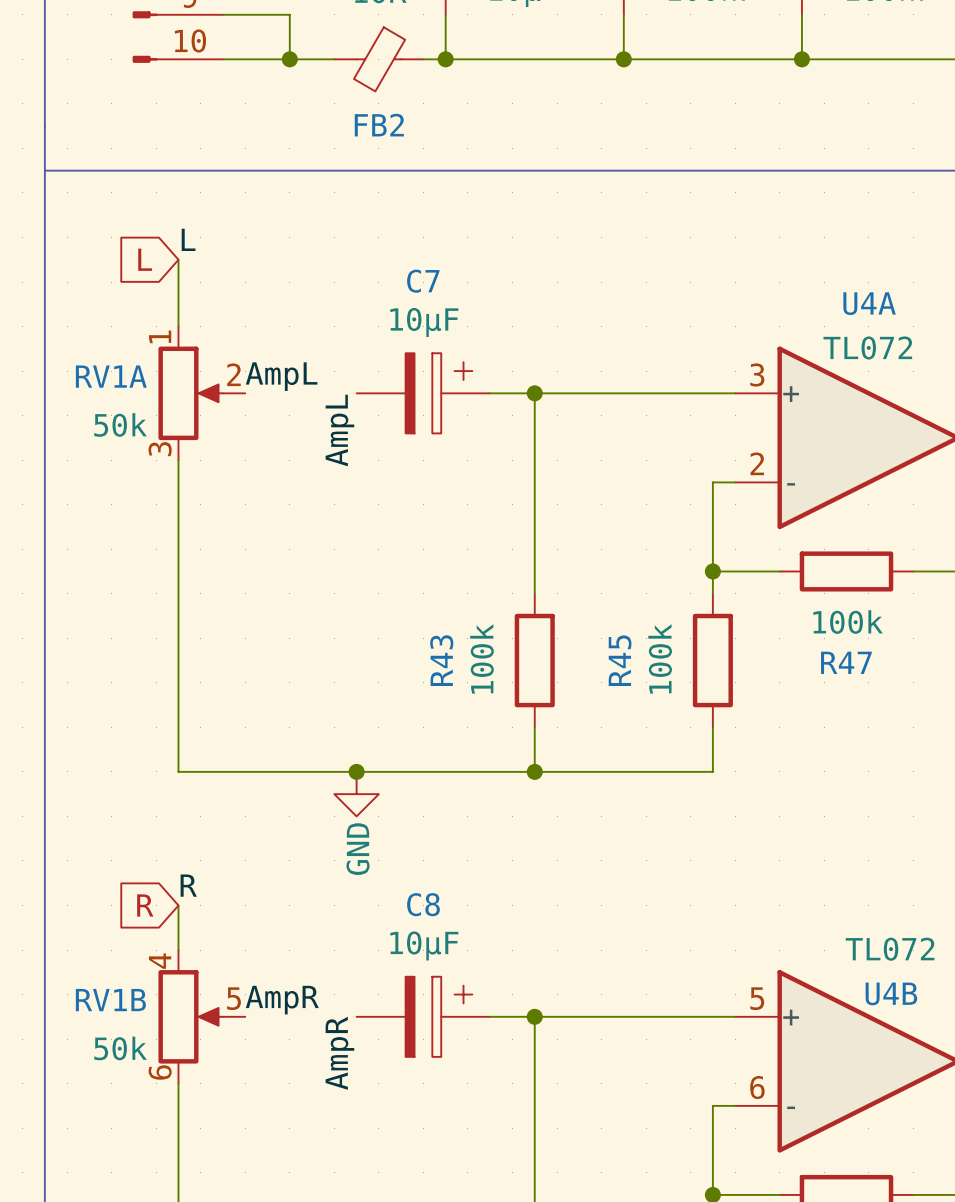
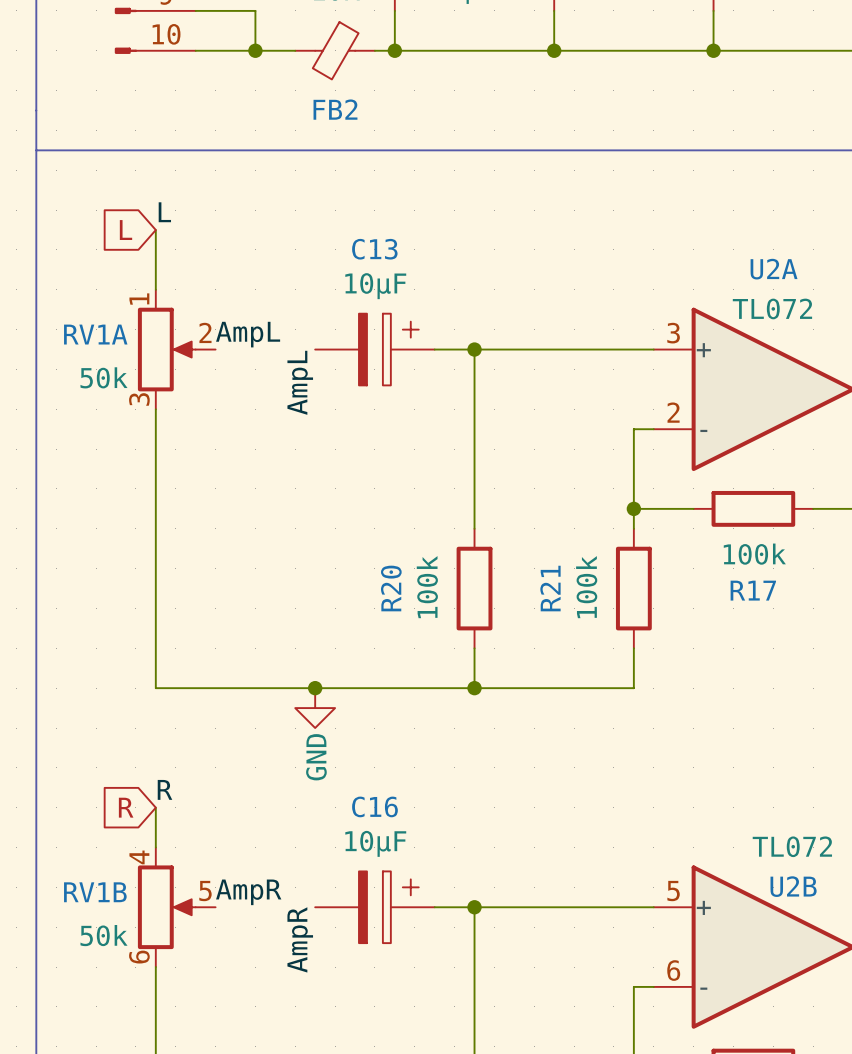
C7 name: C7 (423, 281) -> C13 (374, 249)
U4A name: U4A (869, 303) -> U2A (774, 269)
R43 name: R43 (441, 660) -> R20 (391, 588)
R45 name: R45 (620, 660) -> R21 (550, 588)
R47 name: R47 (846, 662) -> R17 (753, 590)
C8 name: C8 (423, 904) -> C16 (374, 806)
U4B name: U4B (891, 993) -> U2B (793, 886)

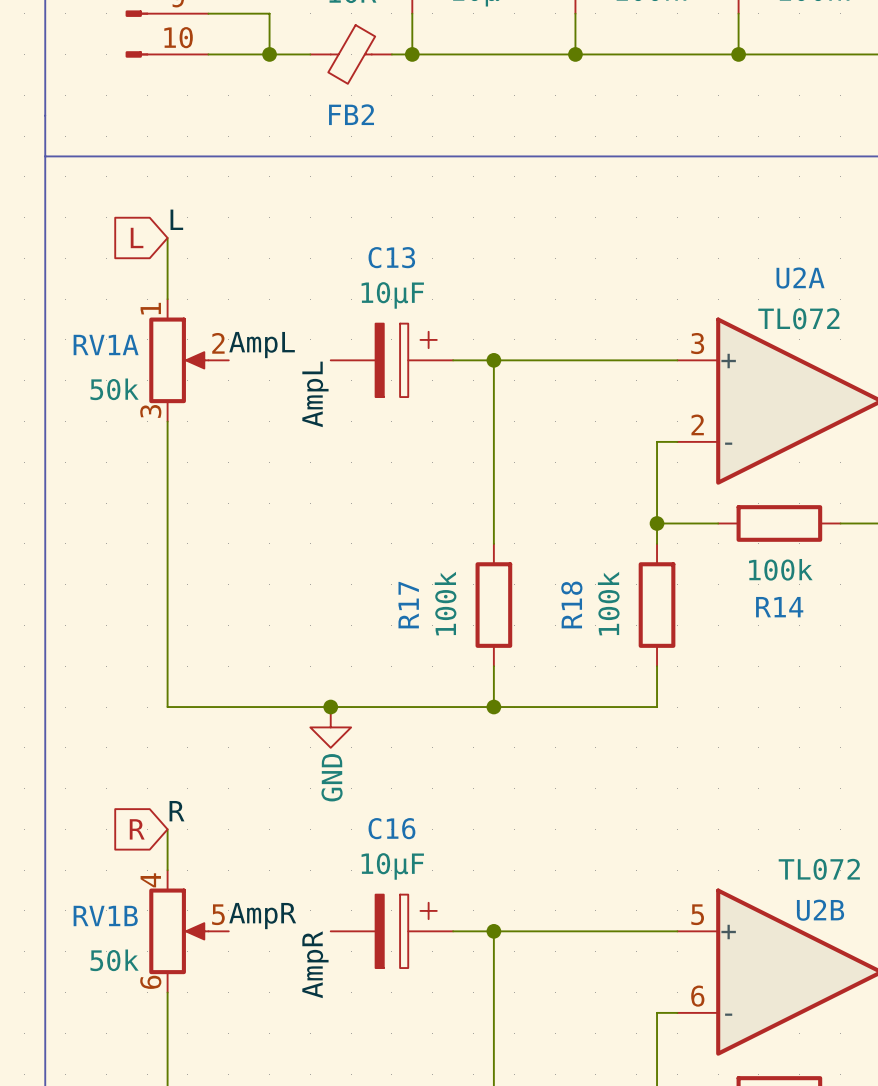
R20 name: R20 (391, 588) -> R17 (408, 605)
R21 name: R21 (550, 588) -> R18 (571, 604)
R17 name: R17 (753, 590) -> R14 (779, 607)

